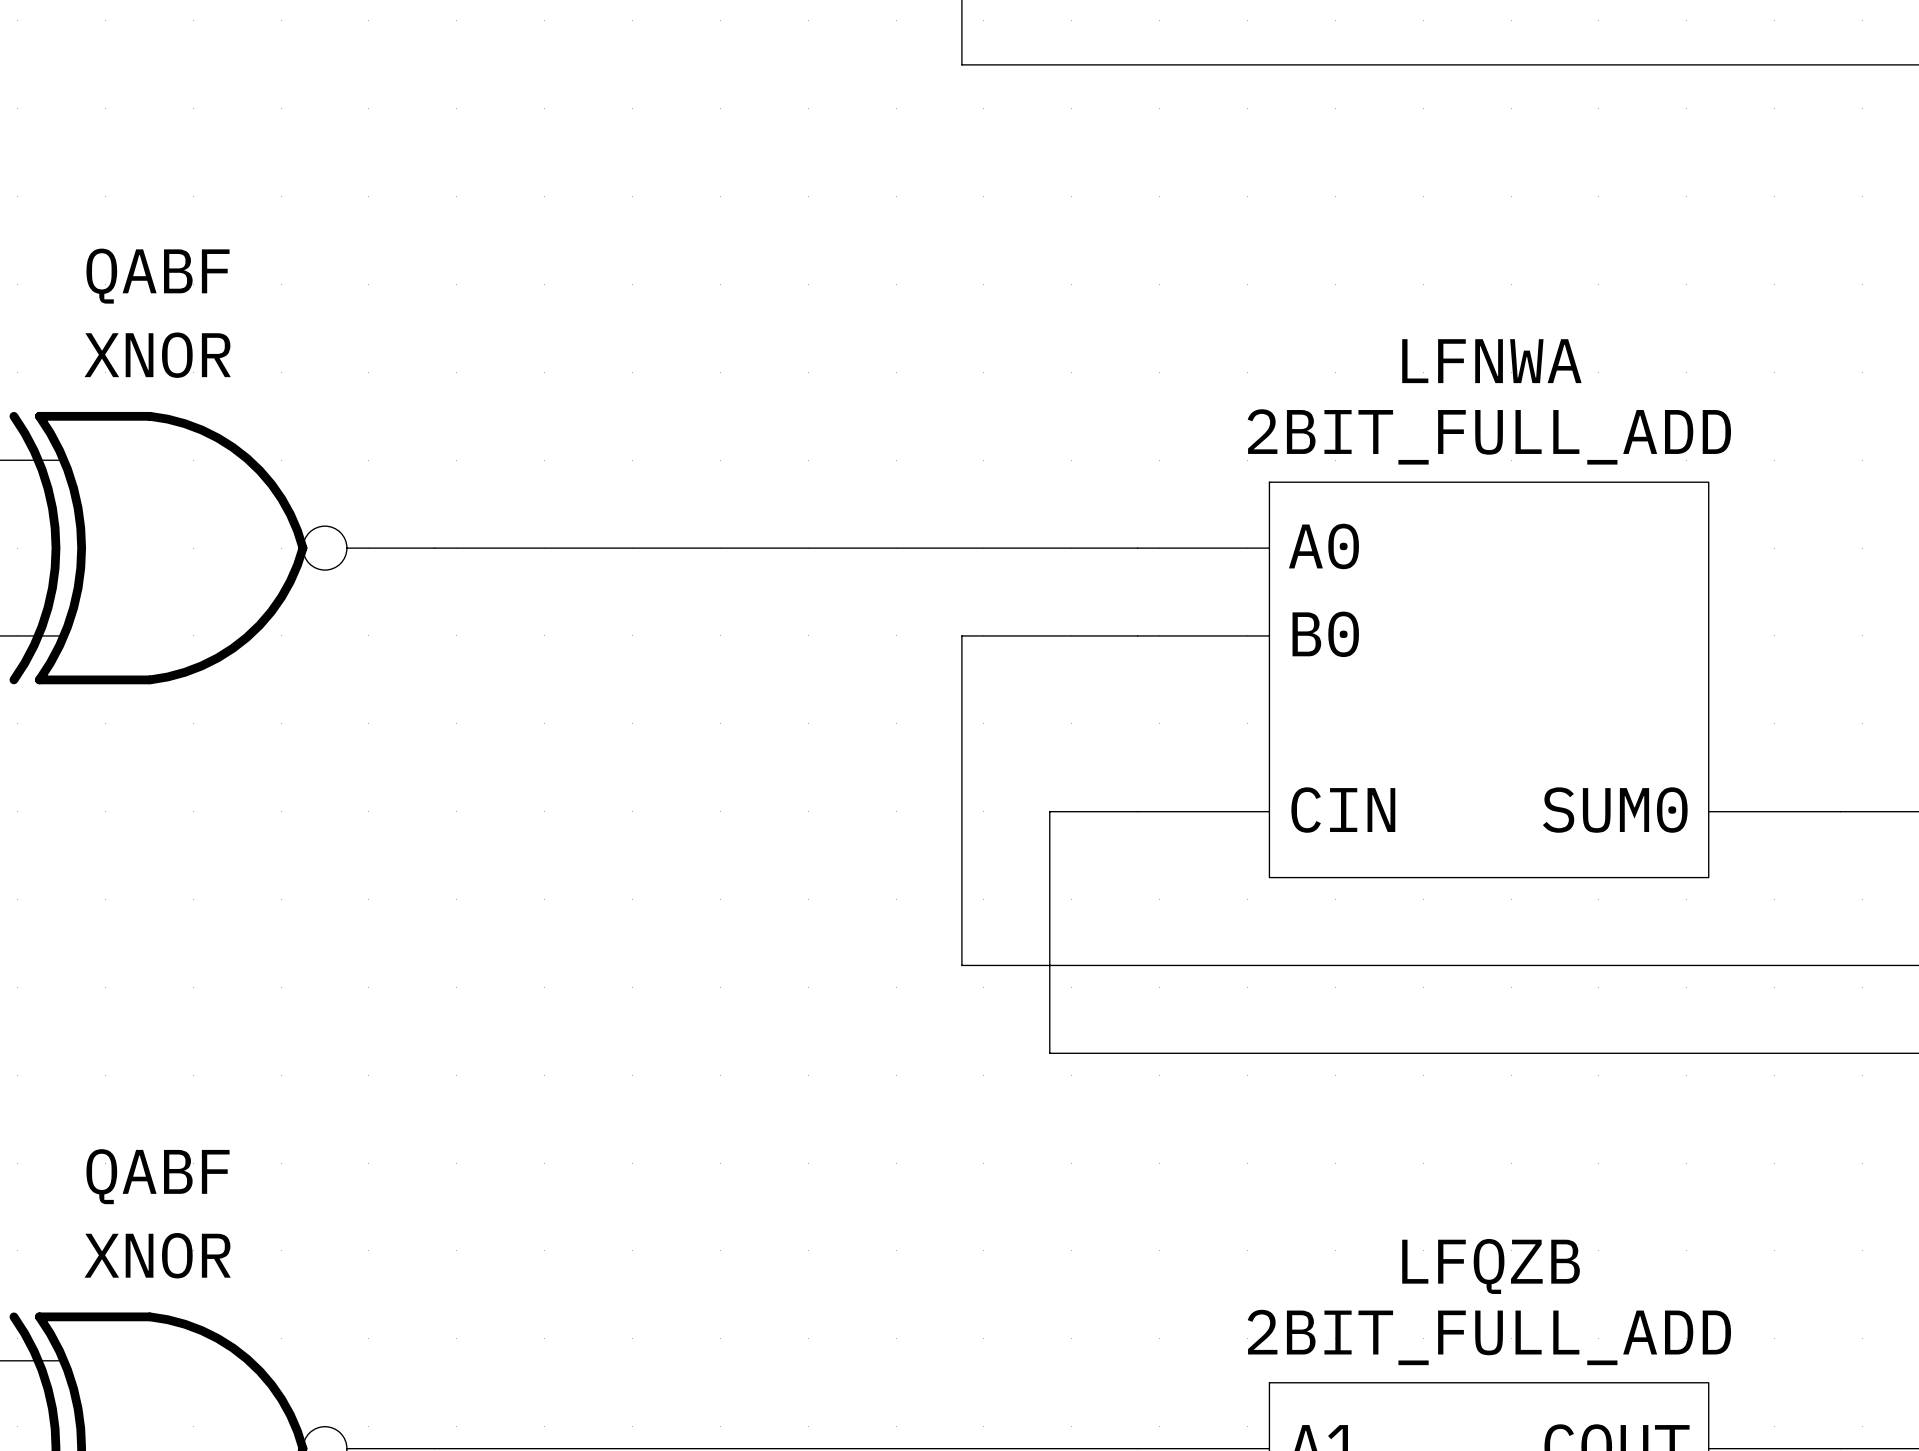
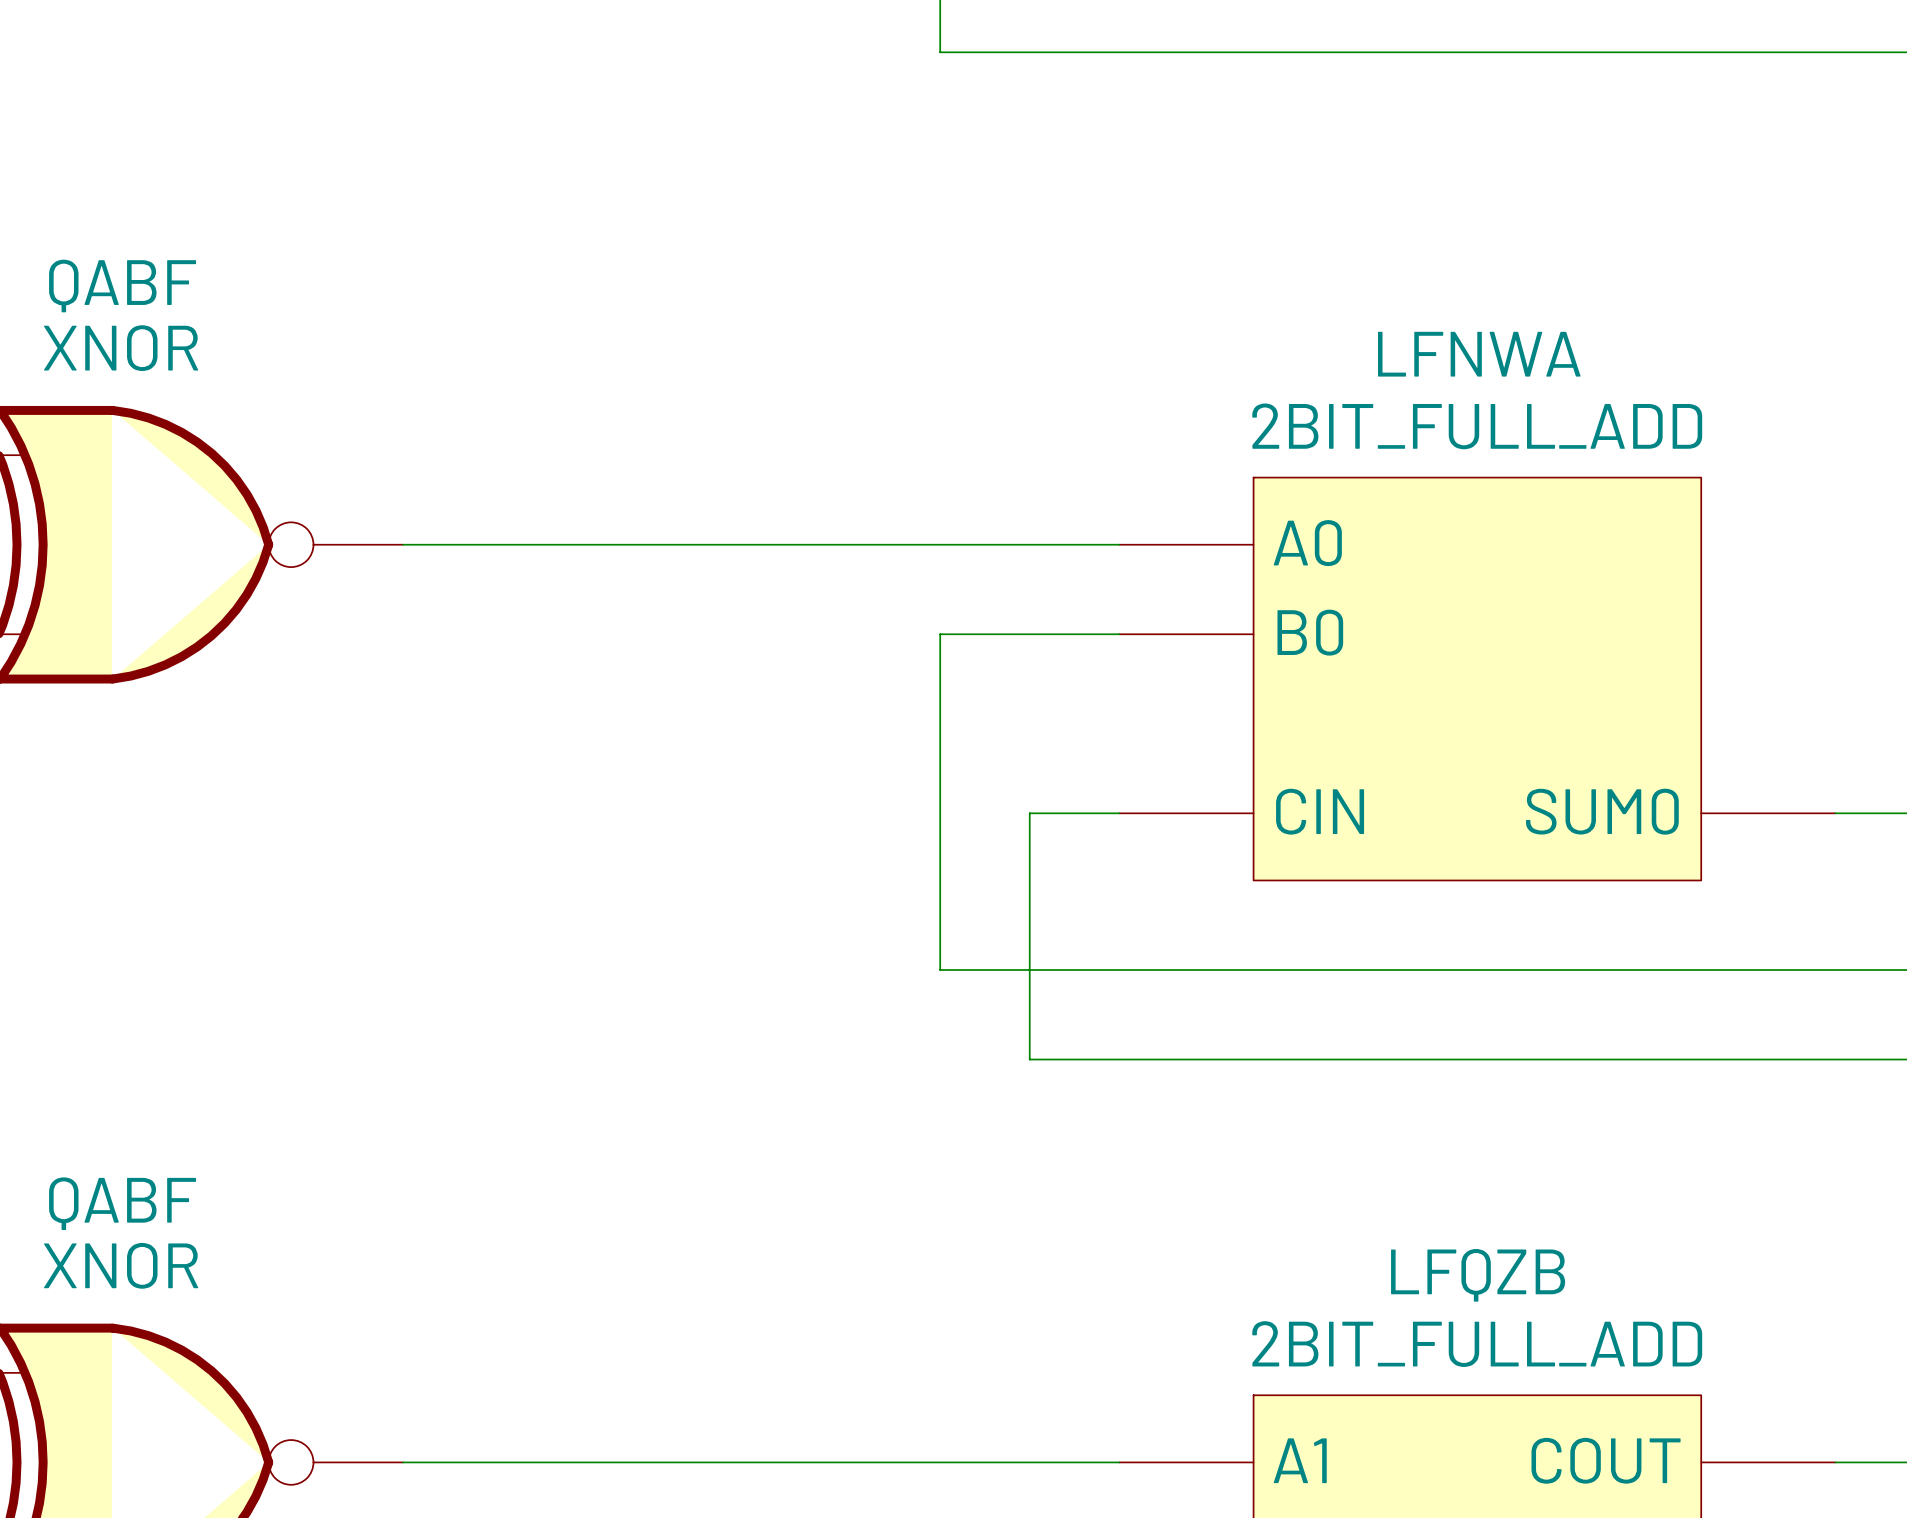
QABF name position: QABF (158, 276) -> QABF (122, 285)
QABF name position: QABF (158, 1176) -> QABF (122, 1203)

